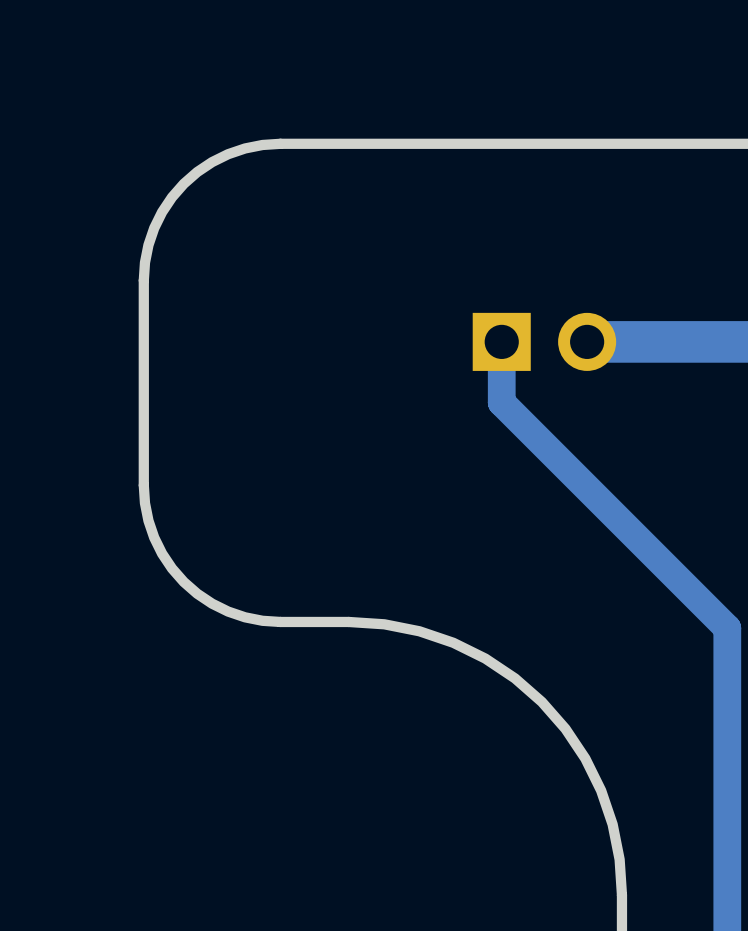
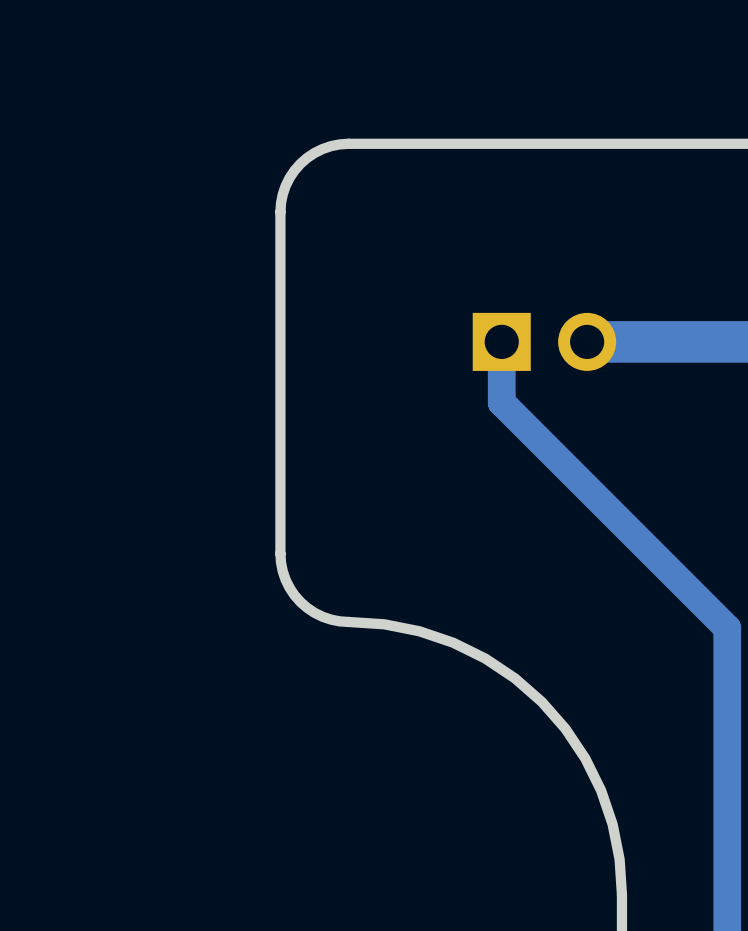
board edge: (348, 143) (262, 144) (228, 154) (212, 162) (183, 183) (162, 212) (148, 245) (143, 280) (144, 503) (154, 537) (162, 553) (172, 568) (197, 593) (228, 611) (262, 620) (348, 621) -> (348, 143) (322, 149) (300, 163) (285, 185) (280, 212) (281, 562) (285, 579) (300, 601) (322, 616) (348, 621)

